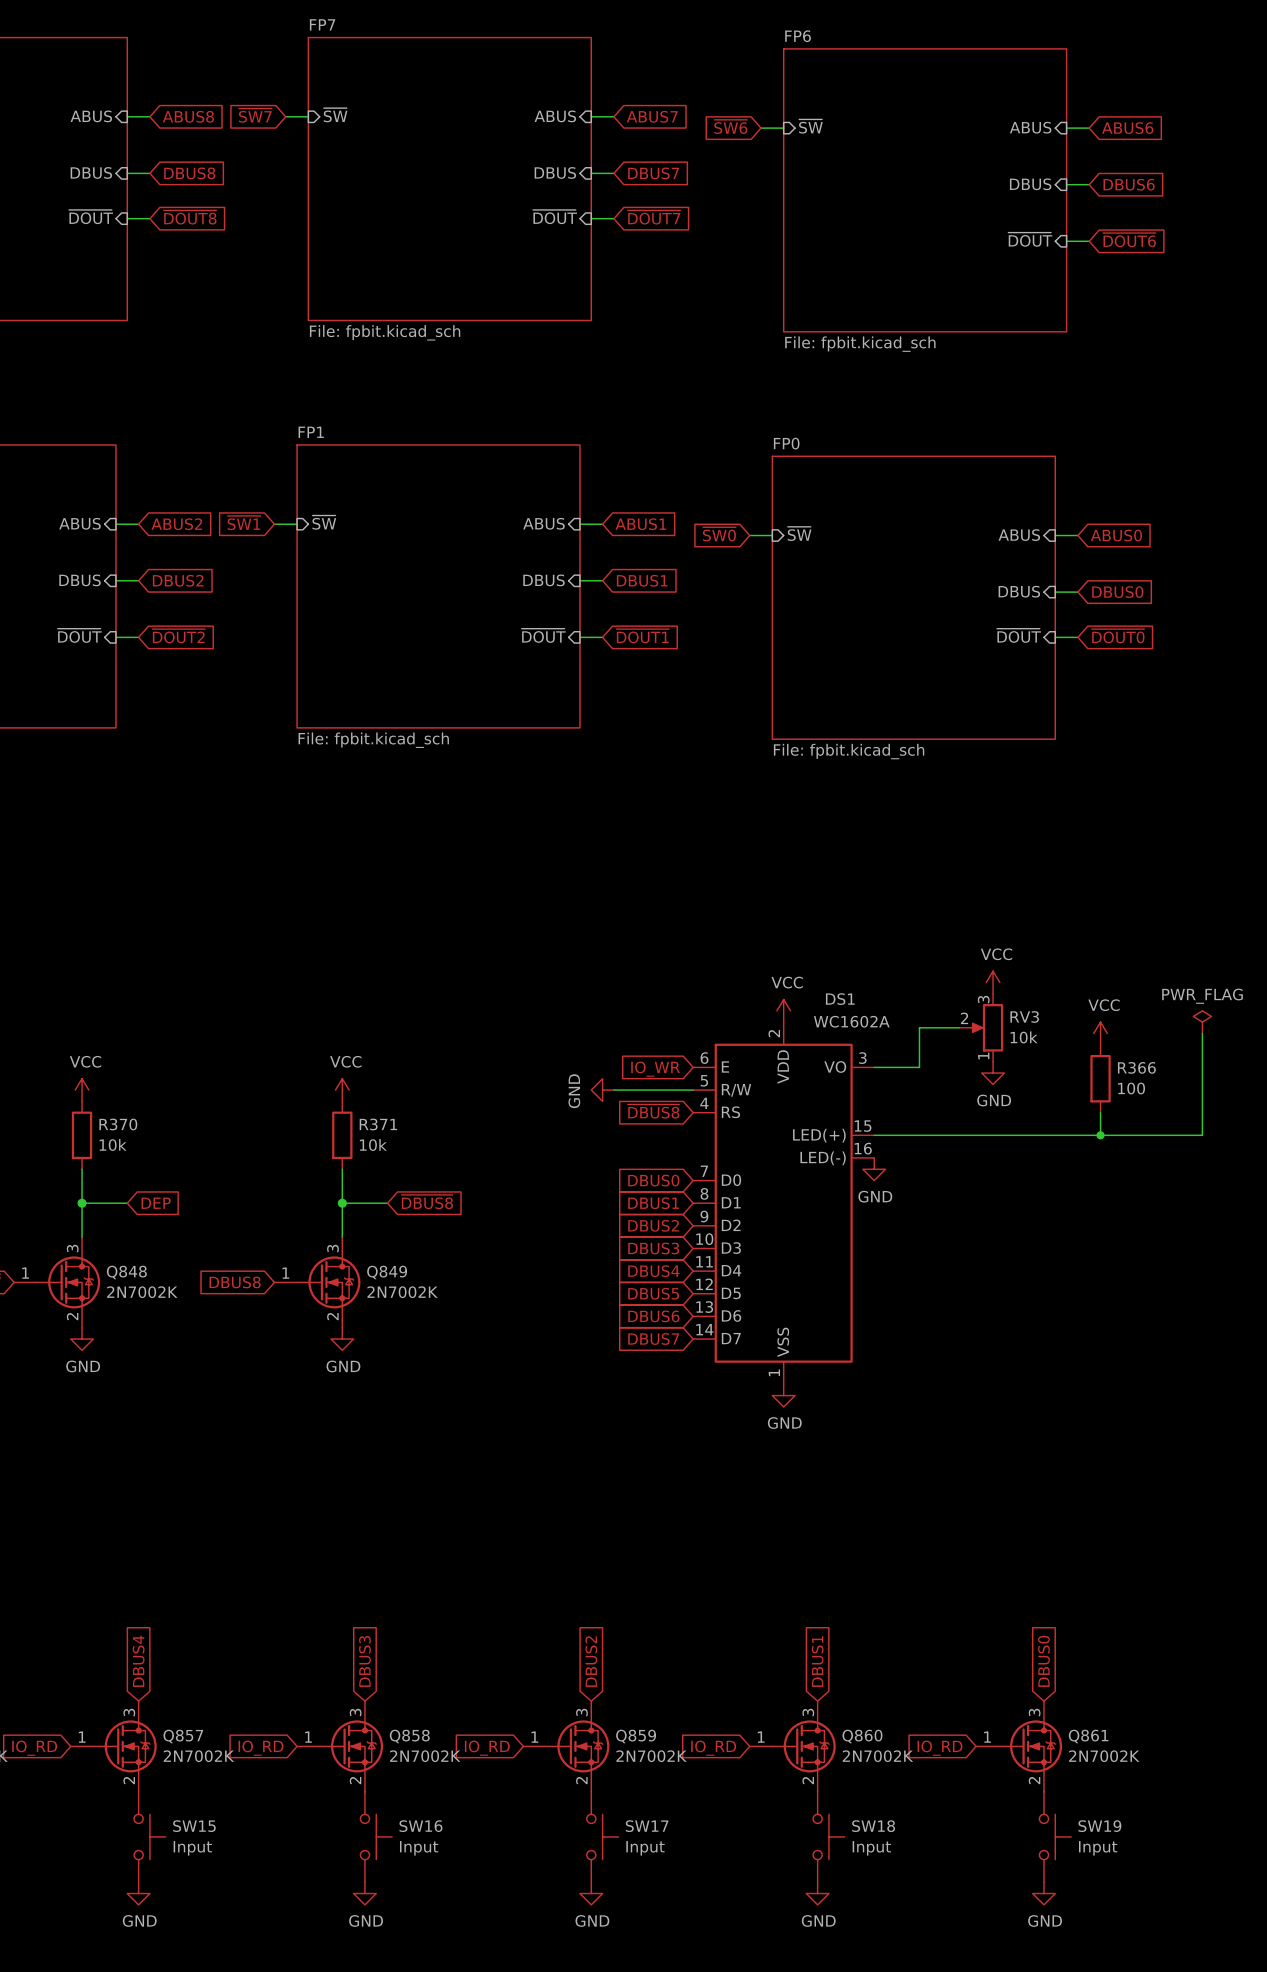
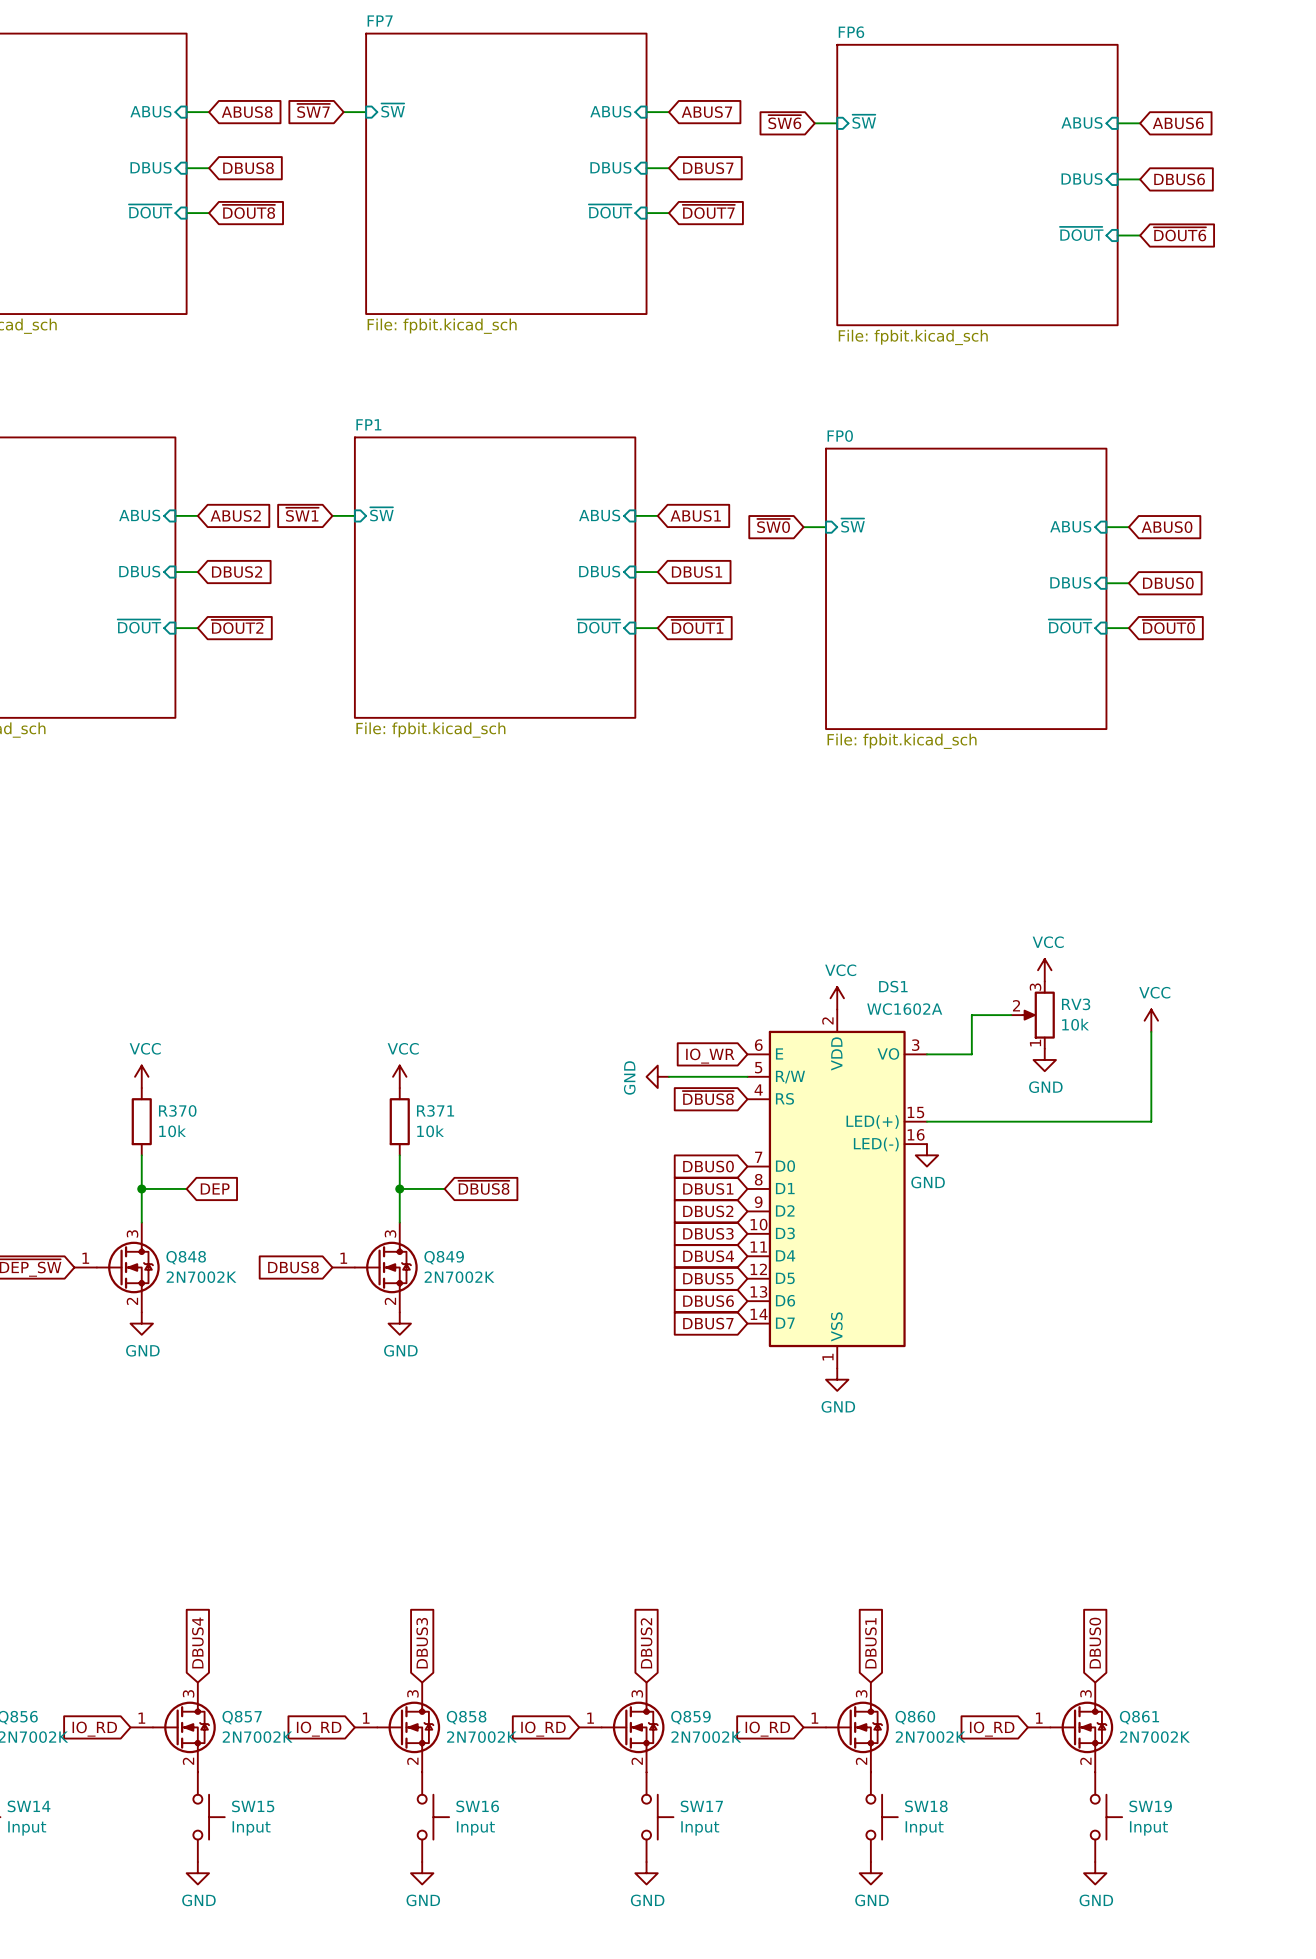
power symbol: PWR_FLAG (1202, 1022) -> none
wire: (1202, 1033) (1202, 1135) (1100, 1135) -> none
wire: none -> (1151, 1031) (1151, 1099)
R366: 100 (1100, 1078) -> none
junction: (1100, 1135) -> none

